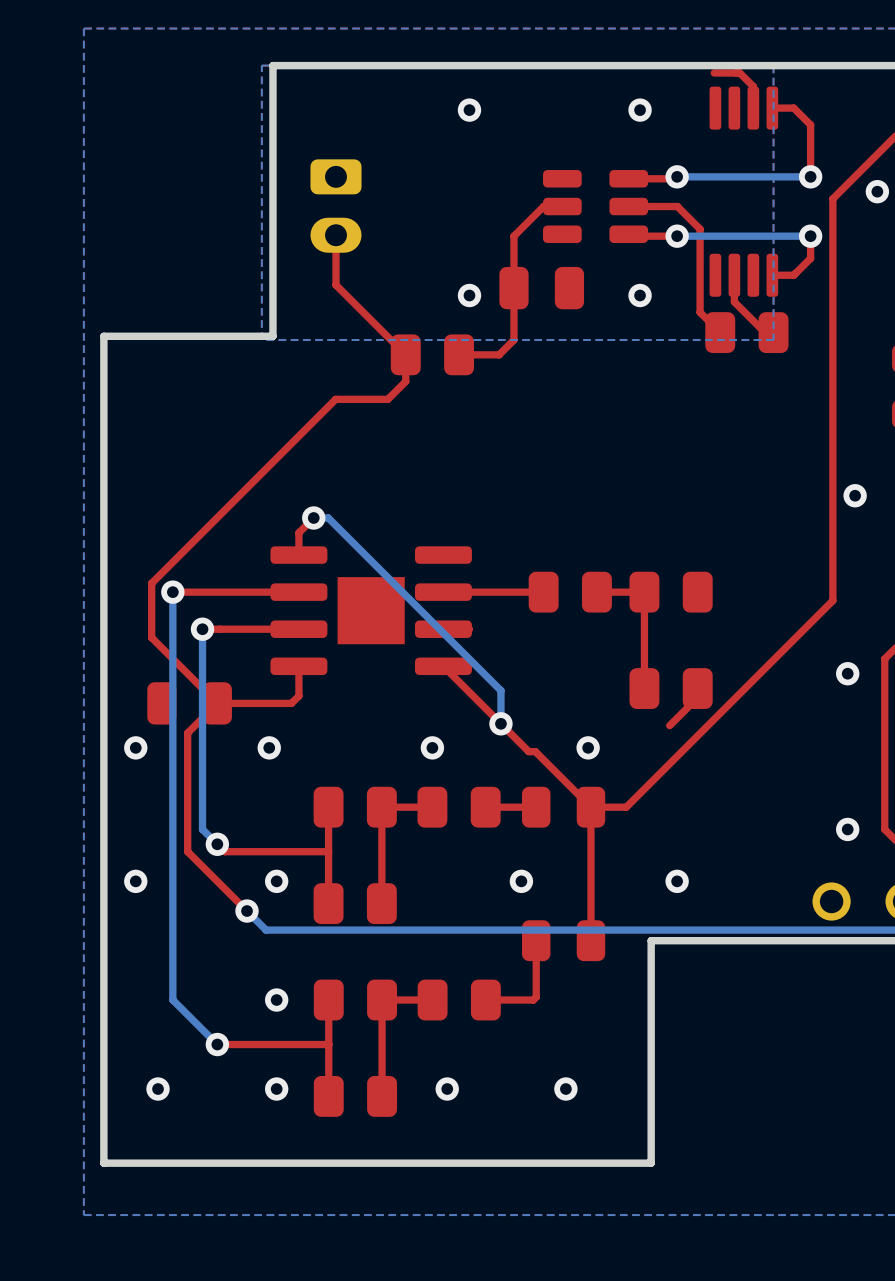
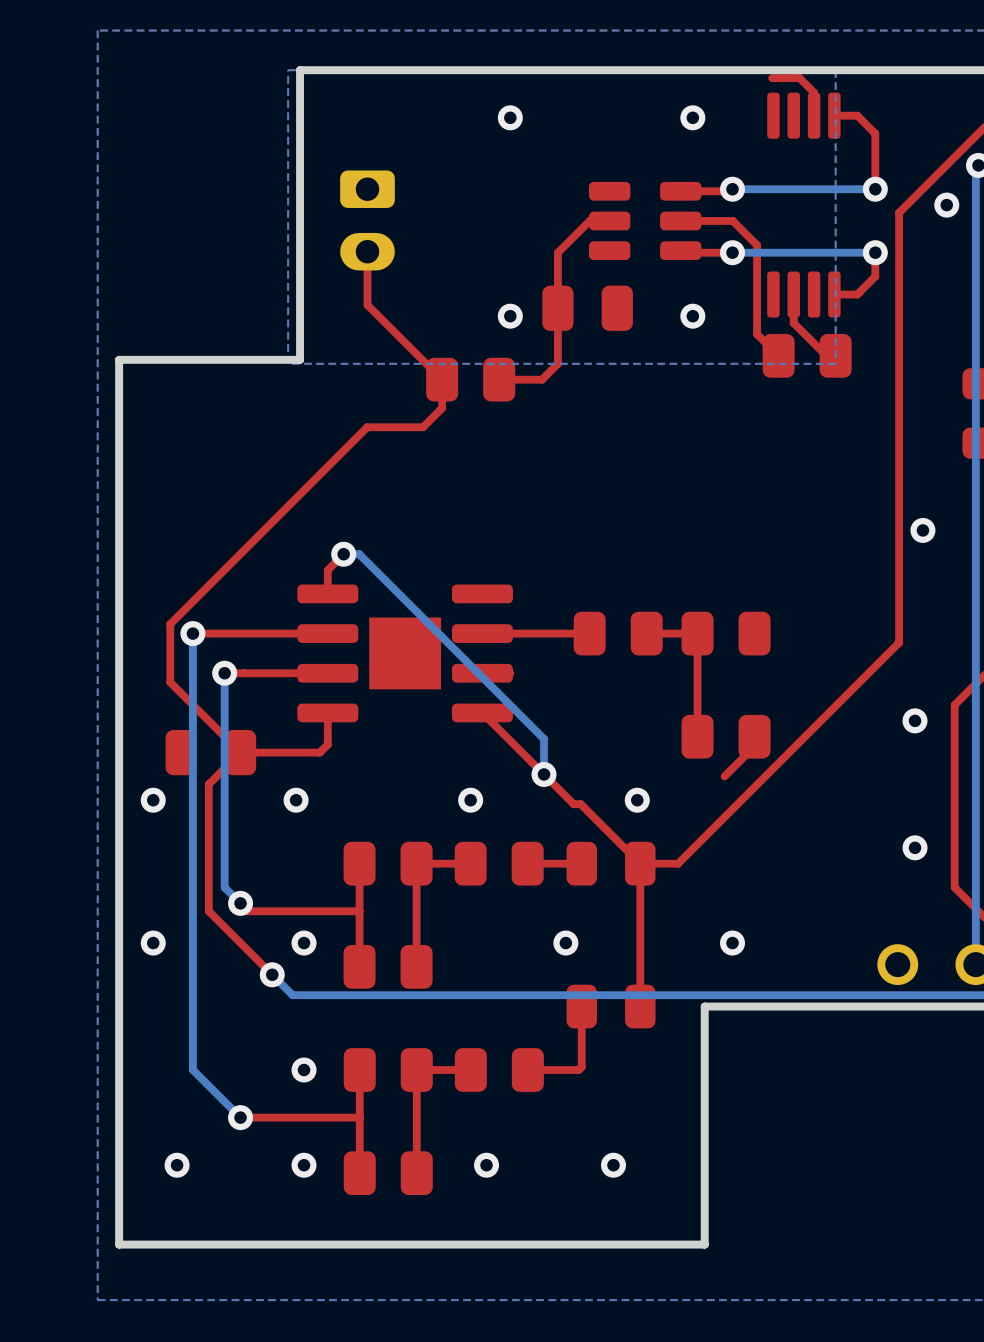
via position: (847, 829) -> (915, 847)

